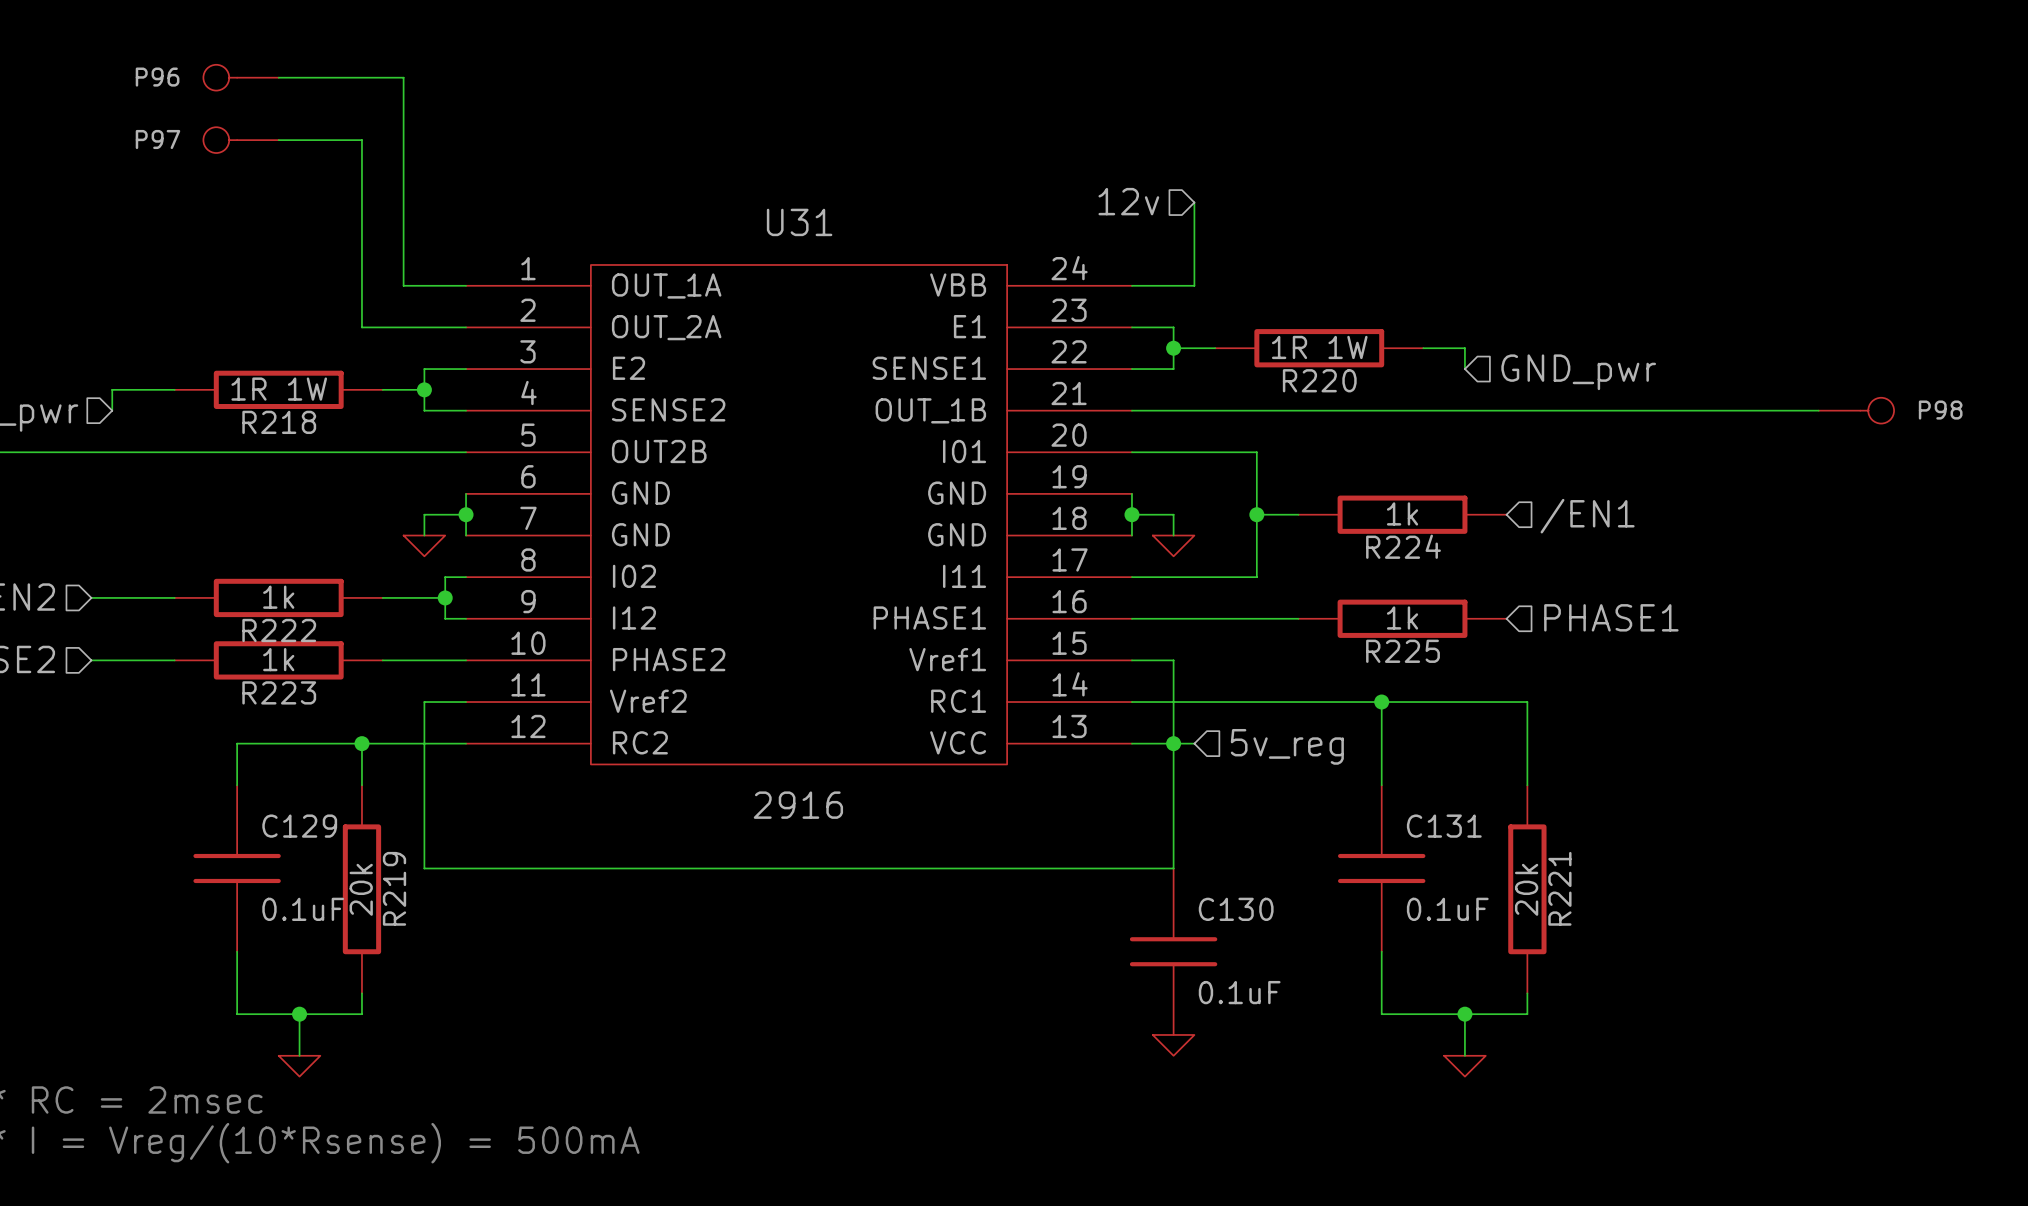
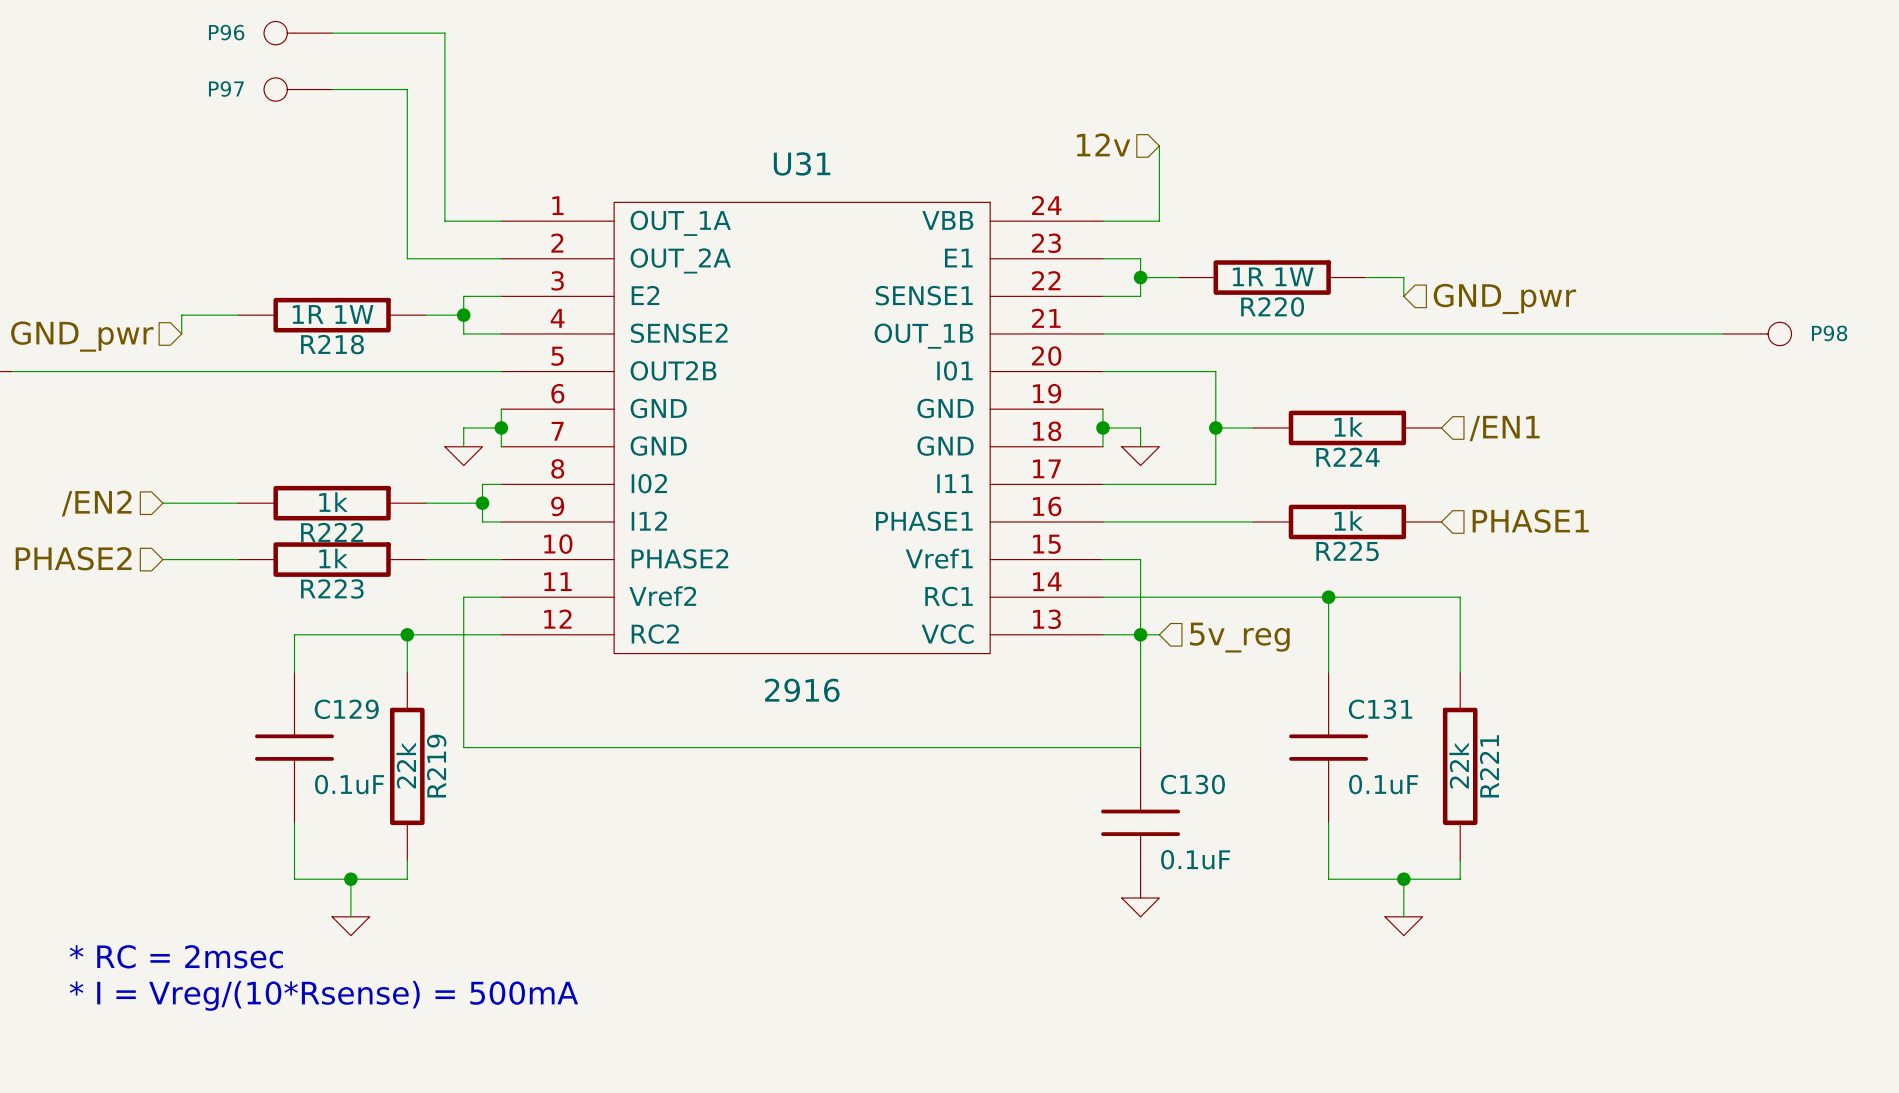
R219 value: 20k (361, 889) -> 22k (406, 765)
R221 value: 20k (1526, 889) -> 22k (1459, 765)

